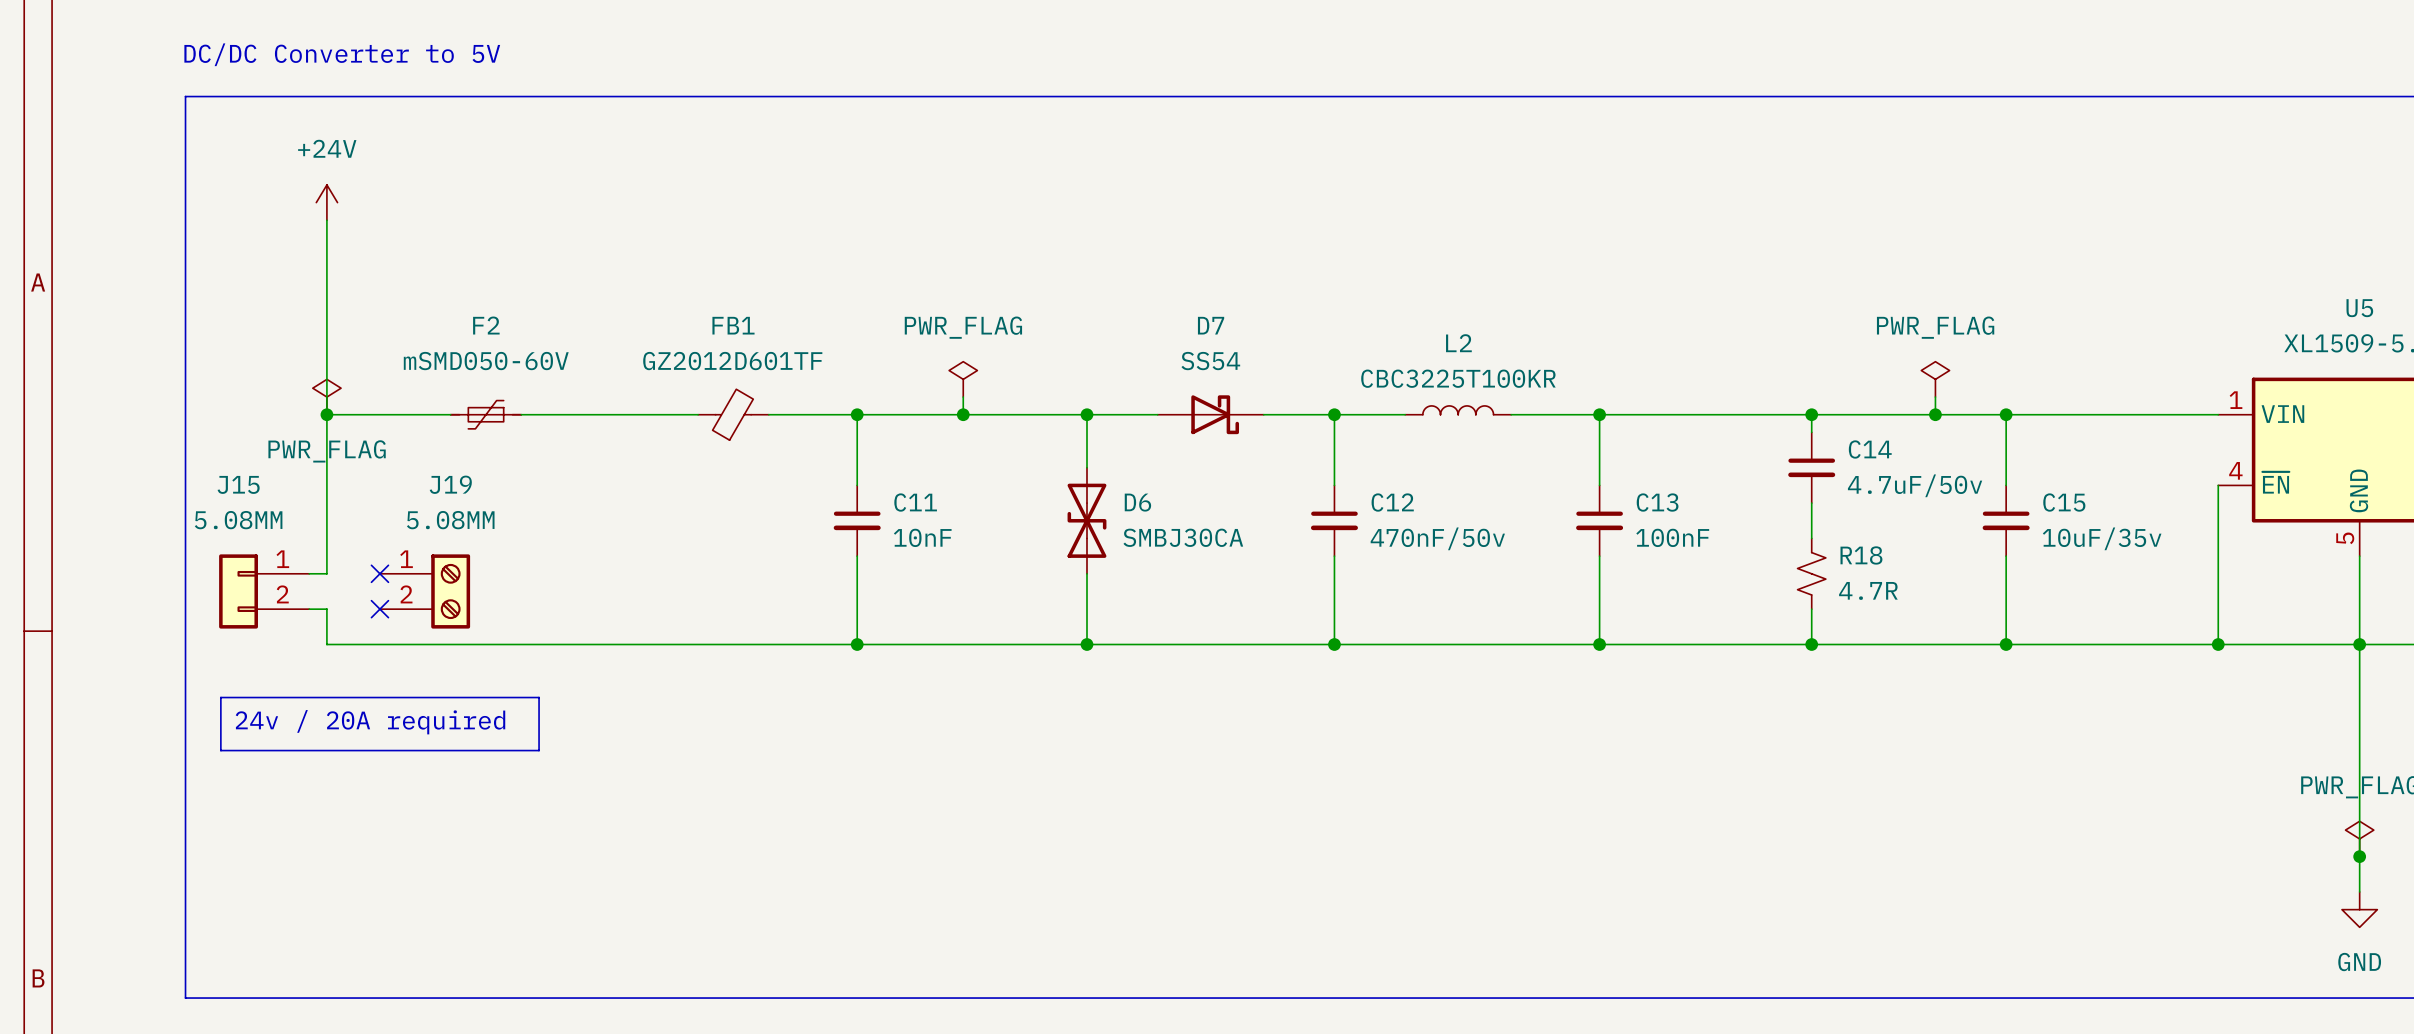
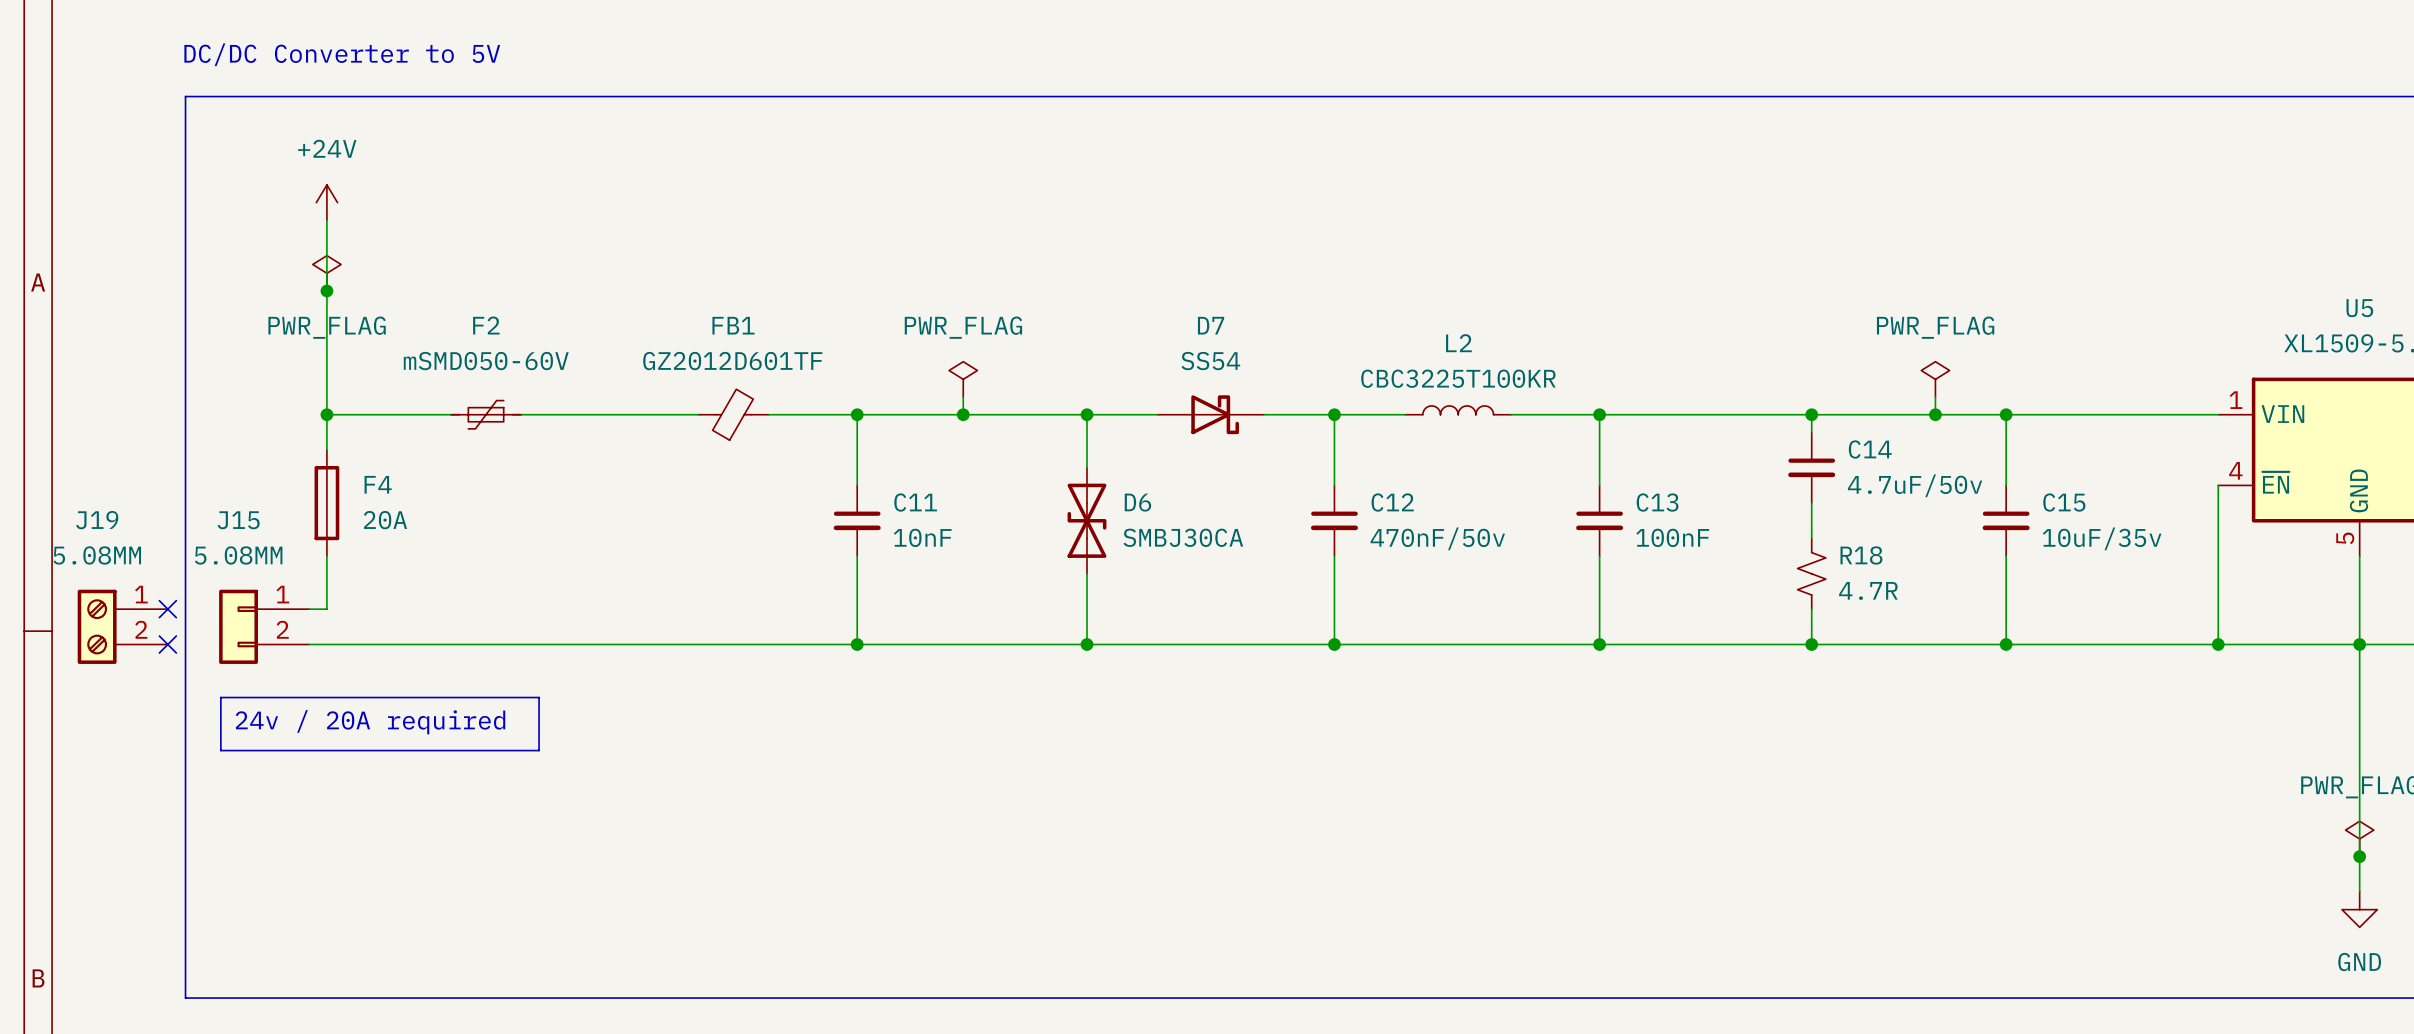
junction: none -> (326, 290)
power symbol position: PWR_FLAG (326, 397) -> PWR_FLAG (326, 273)
F4: none -> 20A (326, 503)
wire: (309, 573) (326, 573) -> (326, 609) (326, 573)
no-connect mark: (379, 573) -> none
J15 position: (264, 591) -> (264, 626)
J19 position: (425, 591) -> (122, 626)
J19 flip: as is (450, 591) -> left-right (97, 626)
no-connect mark: none -> (167, 609)
wire: (326, 609) (326, 644) -> (309, 644) (326, 644)
no-connect mark: (379, 609) -> none
no-connect mark: none -> (167, 644)

